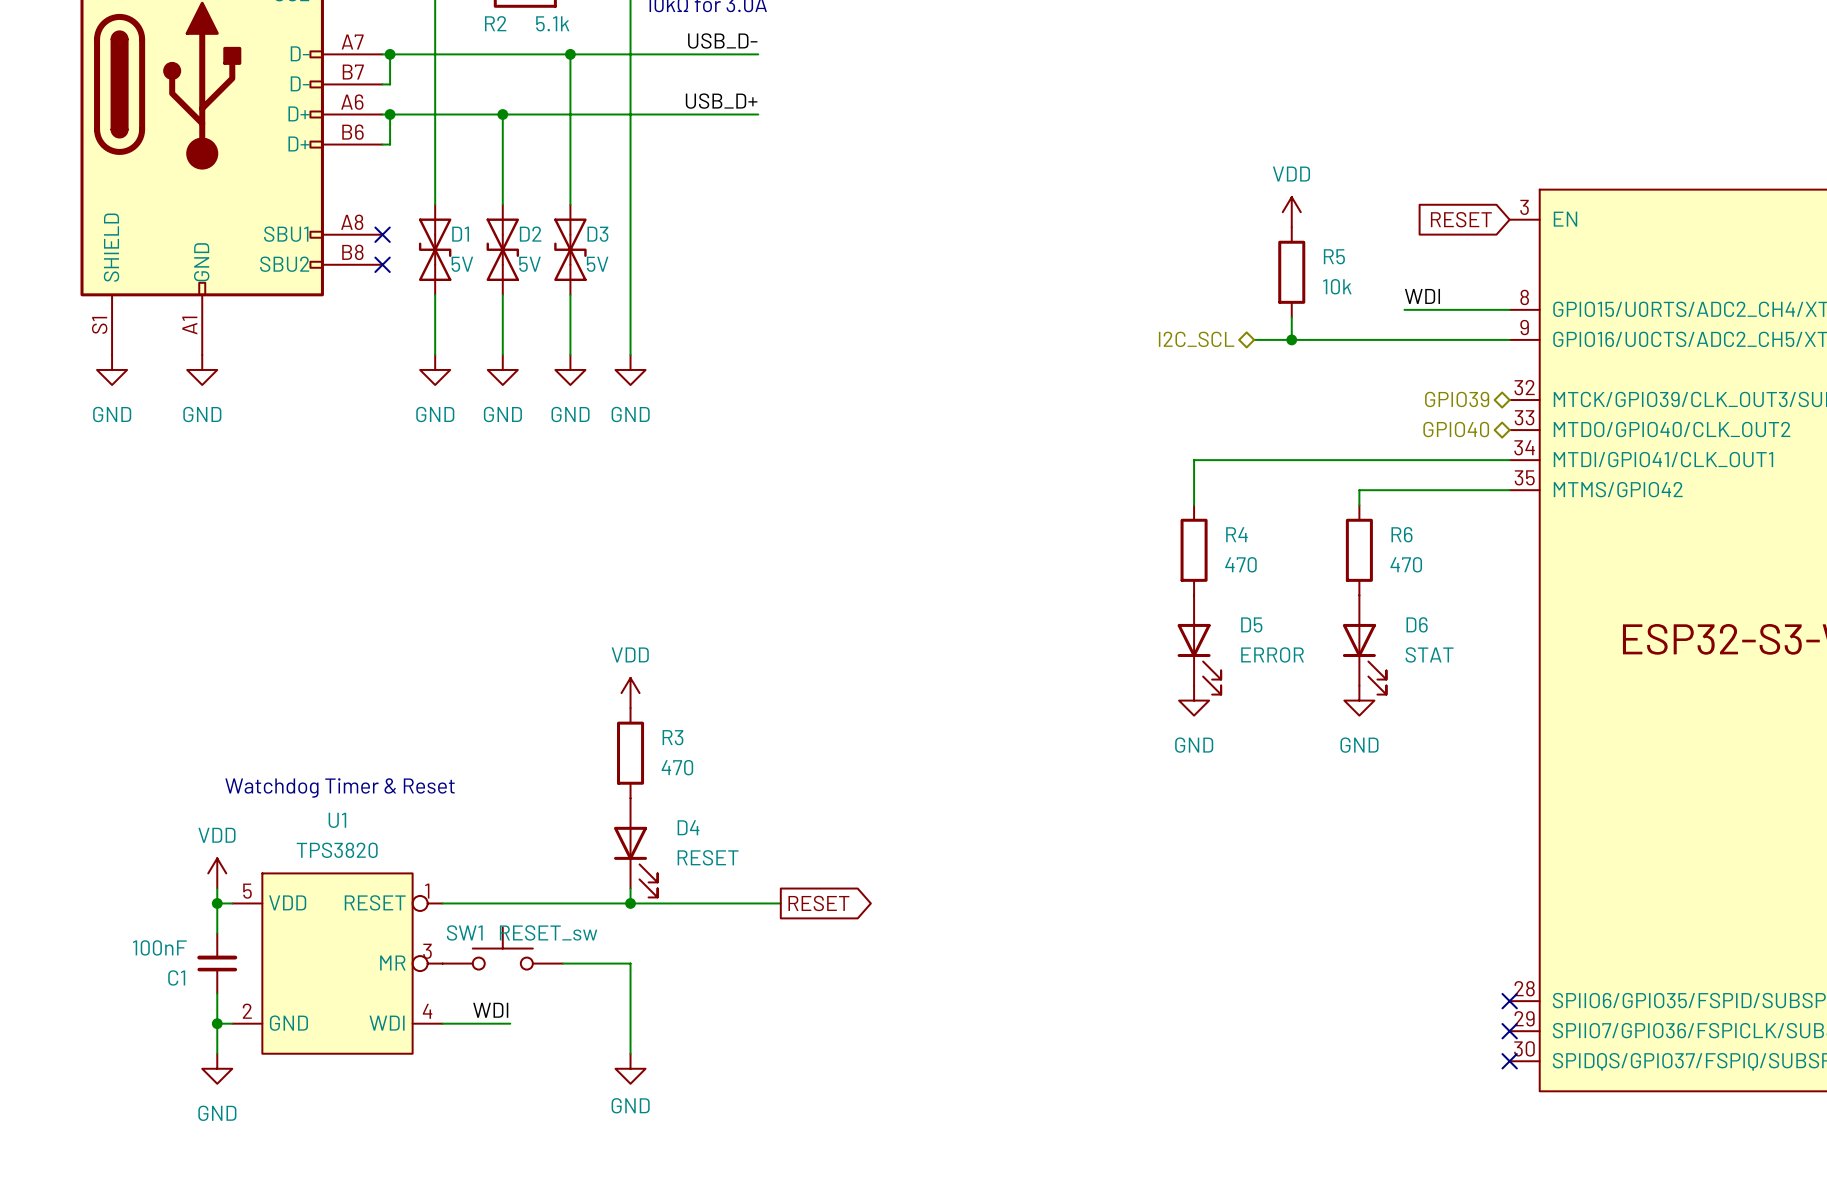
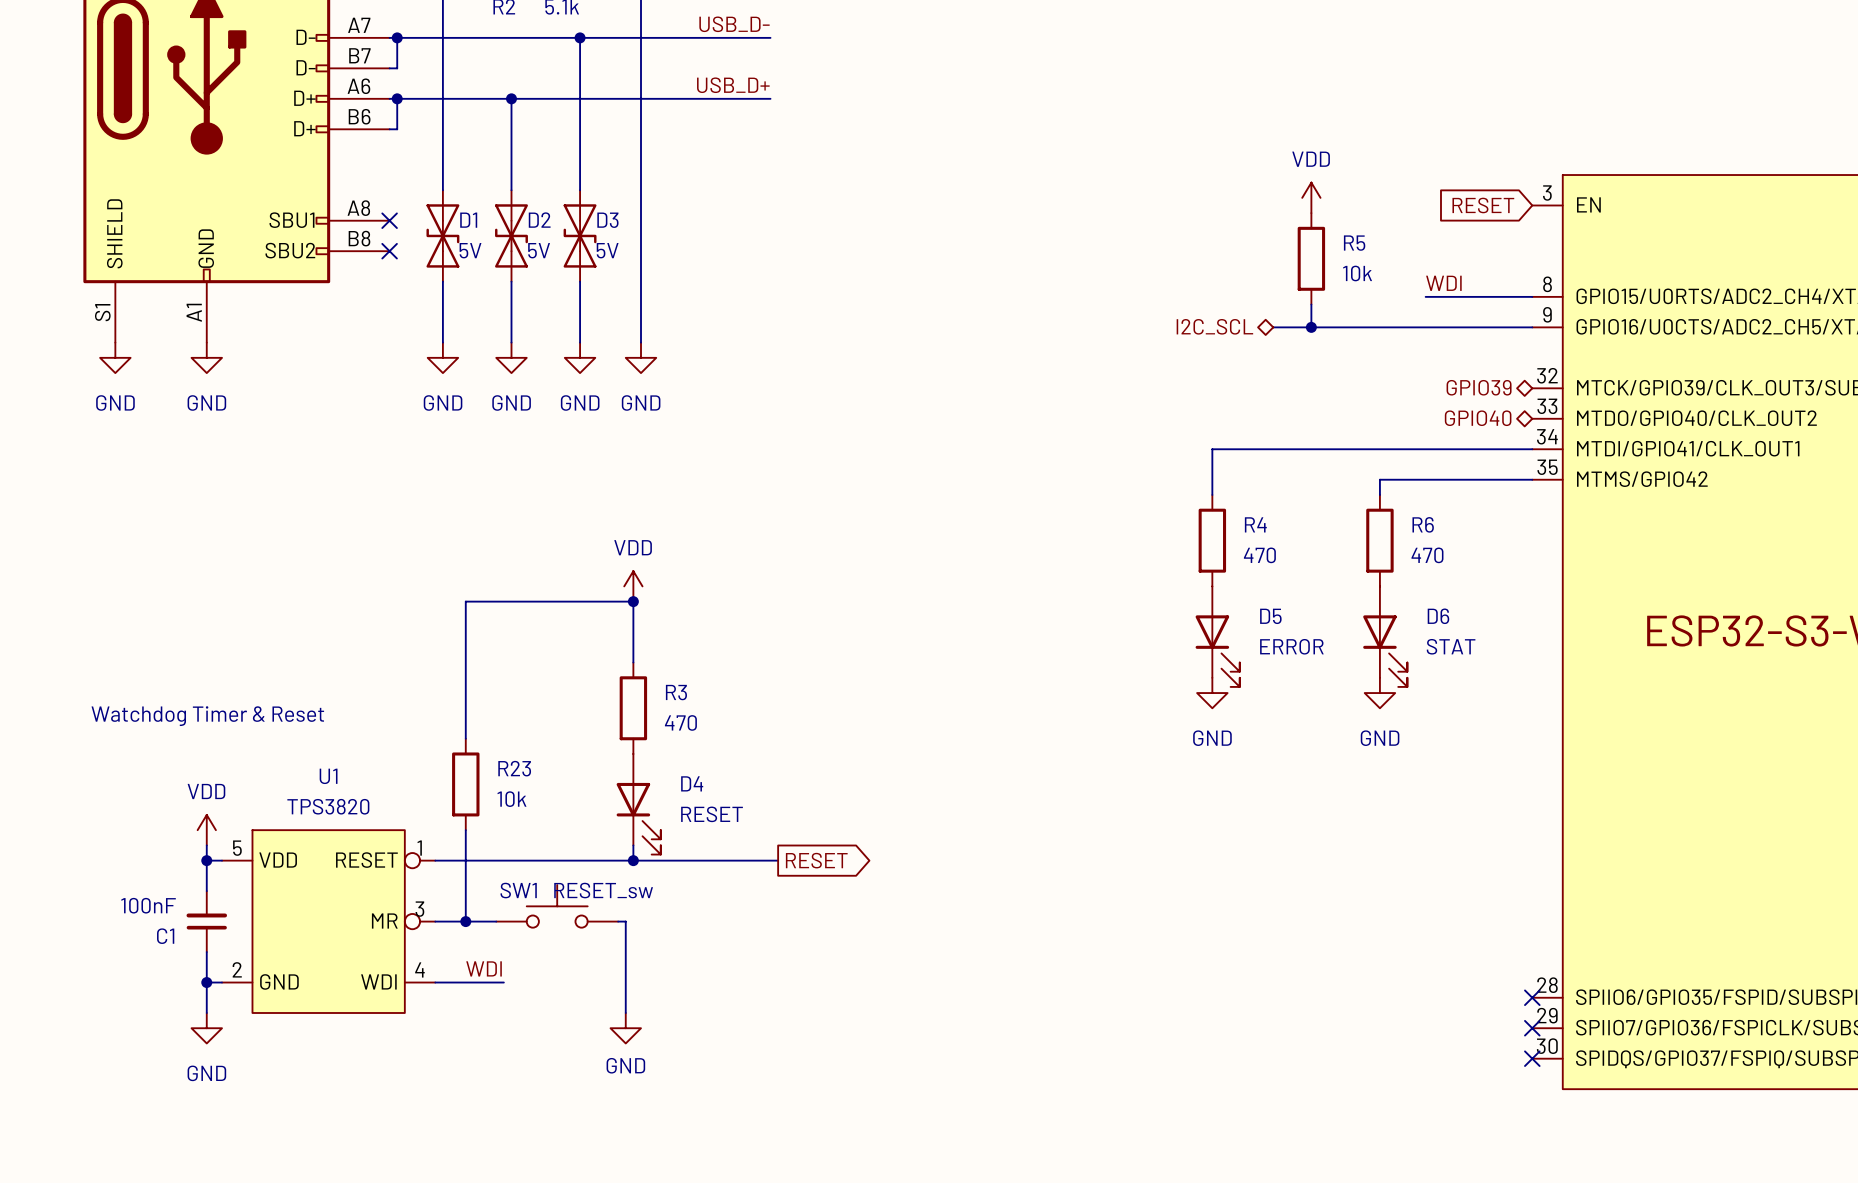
junction: none -> (633, 601)
wire: none -> (633, 662) (633, 601) (465, 601) (465, 738)
power symbol position: VDD (630, 693) -> VDD (633, 586)
R3 position: (630, 753) -> (633, 708)
text position: Watchdog Timer & Reset (340, 787) -> Watchdog Timer & Reset (207, 716)
R23: none -> 10k (465, 784)
wire: none -> (465, 830) (465, 921)
D4 position: (635, 847) -> (638, 804)
power symbol position: VDD (217, 873) -> VDD (206, 830)
wire: (217, 888) (217, 933) -> (206, 845) (206, 891)
wire: (630, 888) (630, 903) -> (633, 845) (633, 860)
wire: (217, 903) (232, 903) -> (206, 860) (222, 860)
junction position: (217, 903) -> (206, 860)
wire: (442, 903) (780, 903) -> (435, 860) (778, 860)
junction position: (630, 903) -> (633, 860)
global label position: RESET (818, 903) -> RESET (816, 860)
wire: none -> (435, 921) (496, 921)
junction: none -> (465, 921)
wire: none -> (618, 921) (625, 921) (625, 1012)
SW1 position: (502, 948) -> (557, 906)
C1 position: (217, 963) -> (206, 921)
U1 position: (337, 963) -> (328, 921)
wire: (562, 963) (630, 963) (630, 1053) -> none
wire: (217, 993) (217, 1053) -> (206, 952) (206, 1012)
label position: WDI (490, 1010) -> WDI (484, 968)
wire: (217, 1023) (232, 1023) -> (206, 982) (222, 982)
junction position: (217, 1023) -> (206, 982)
wire: (442, 1023) (510, 1023) -> (435, 982) (503, 982)
power symbol position: GND (217, 1068) -> GND (206, 1028)
power symbol position: GND (630, 1068) -> GND (625, 1028)

